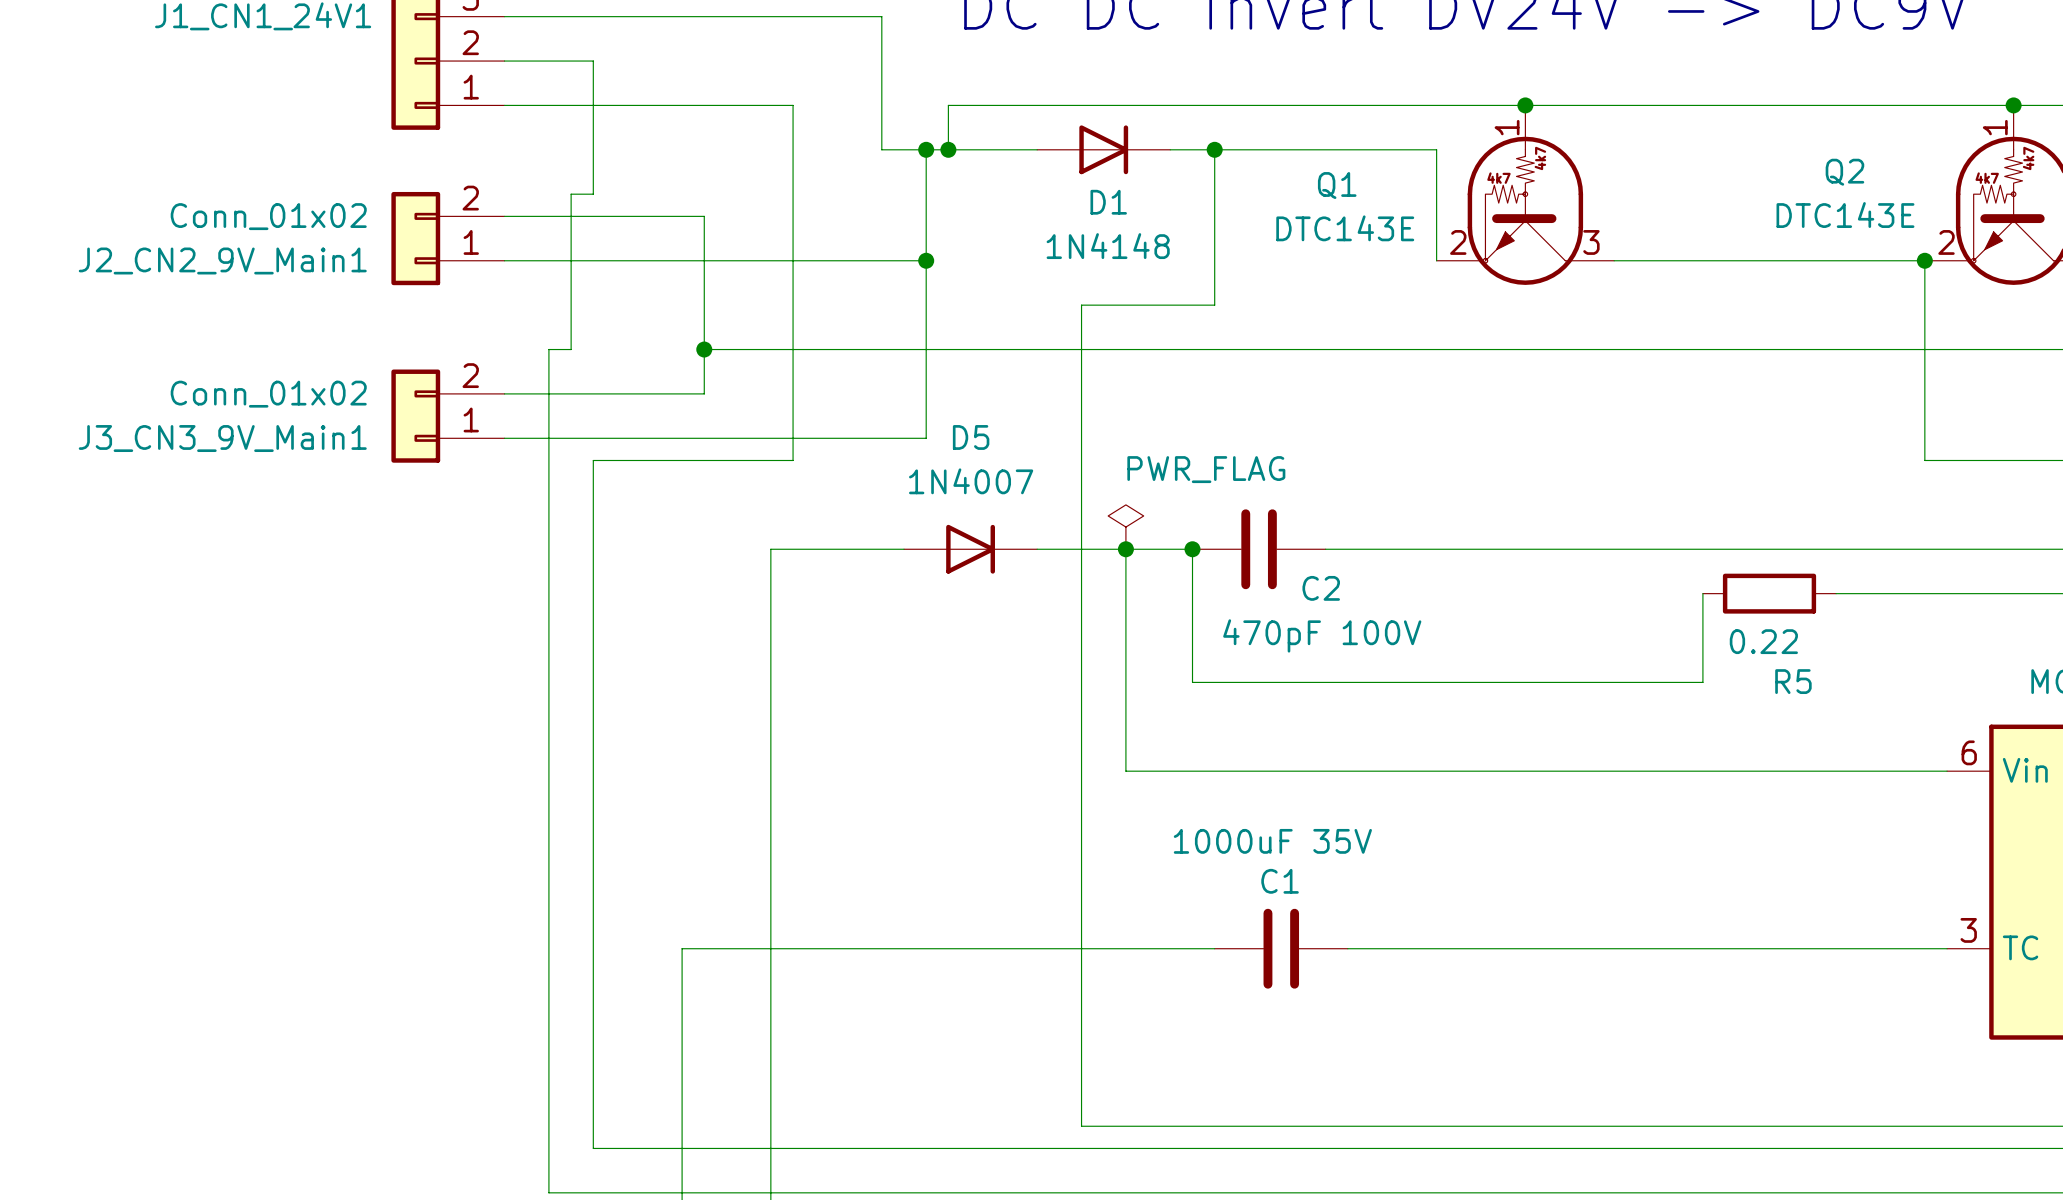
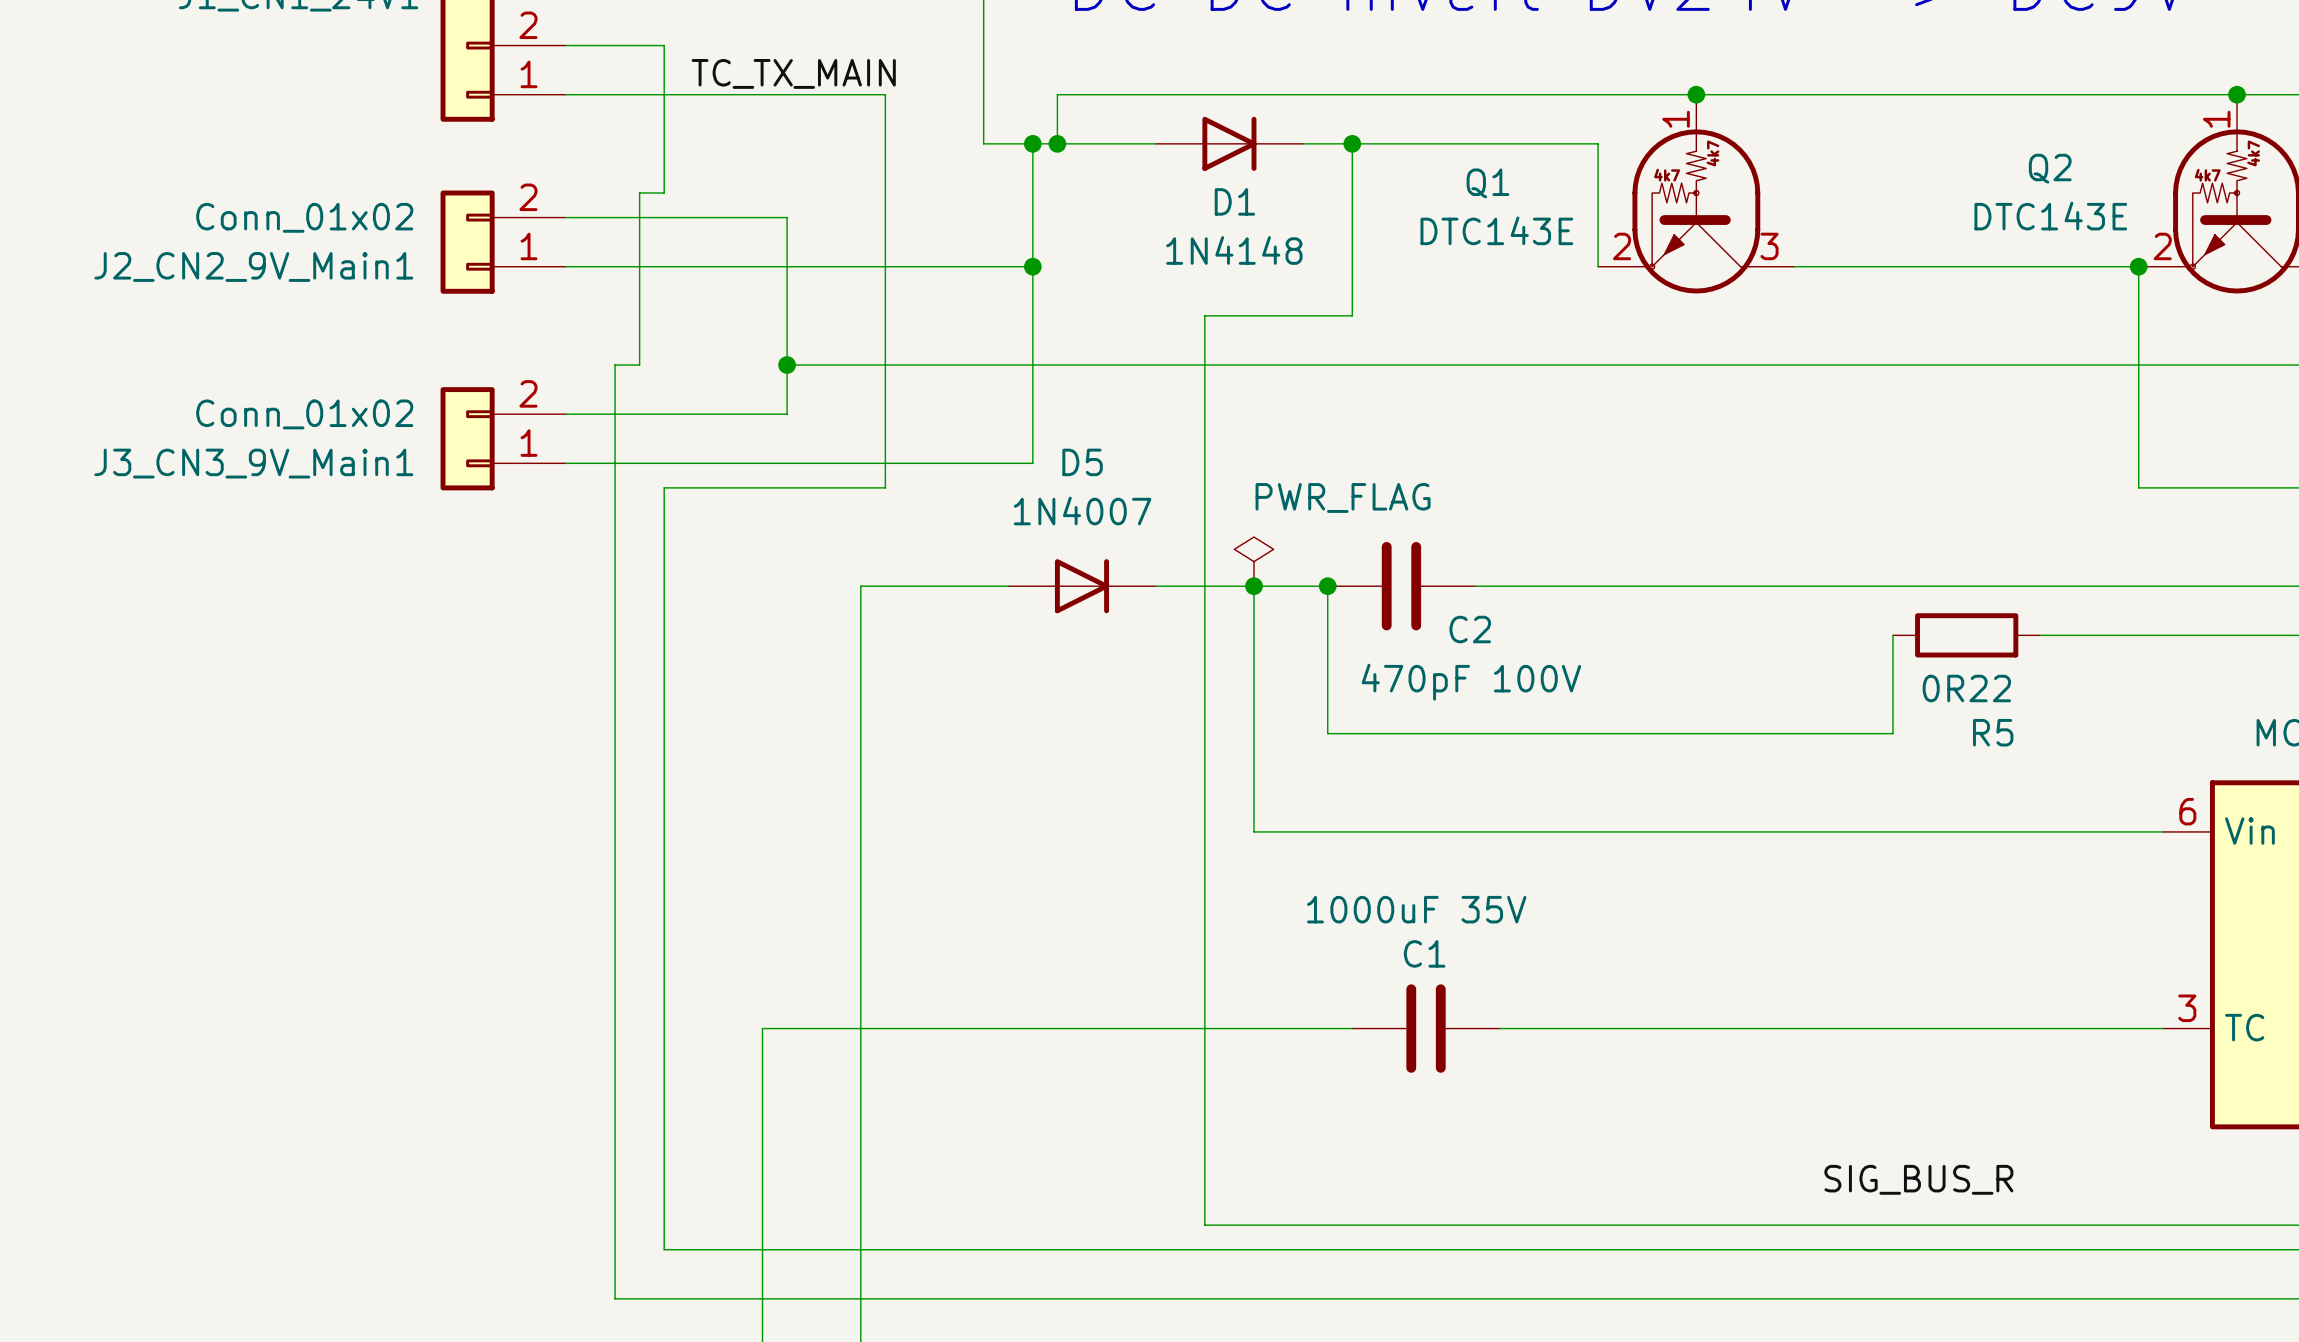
label: none -> TC_TX_MAIN (793, 73)
R5 value: 0.22 (1763, 641) -> 0R22 (1966, 688)
label: none -> SIG_BUS_R (1918, 1179)

